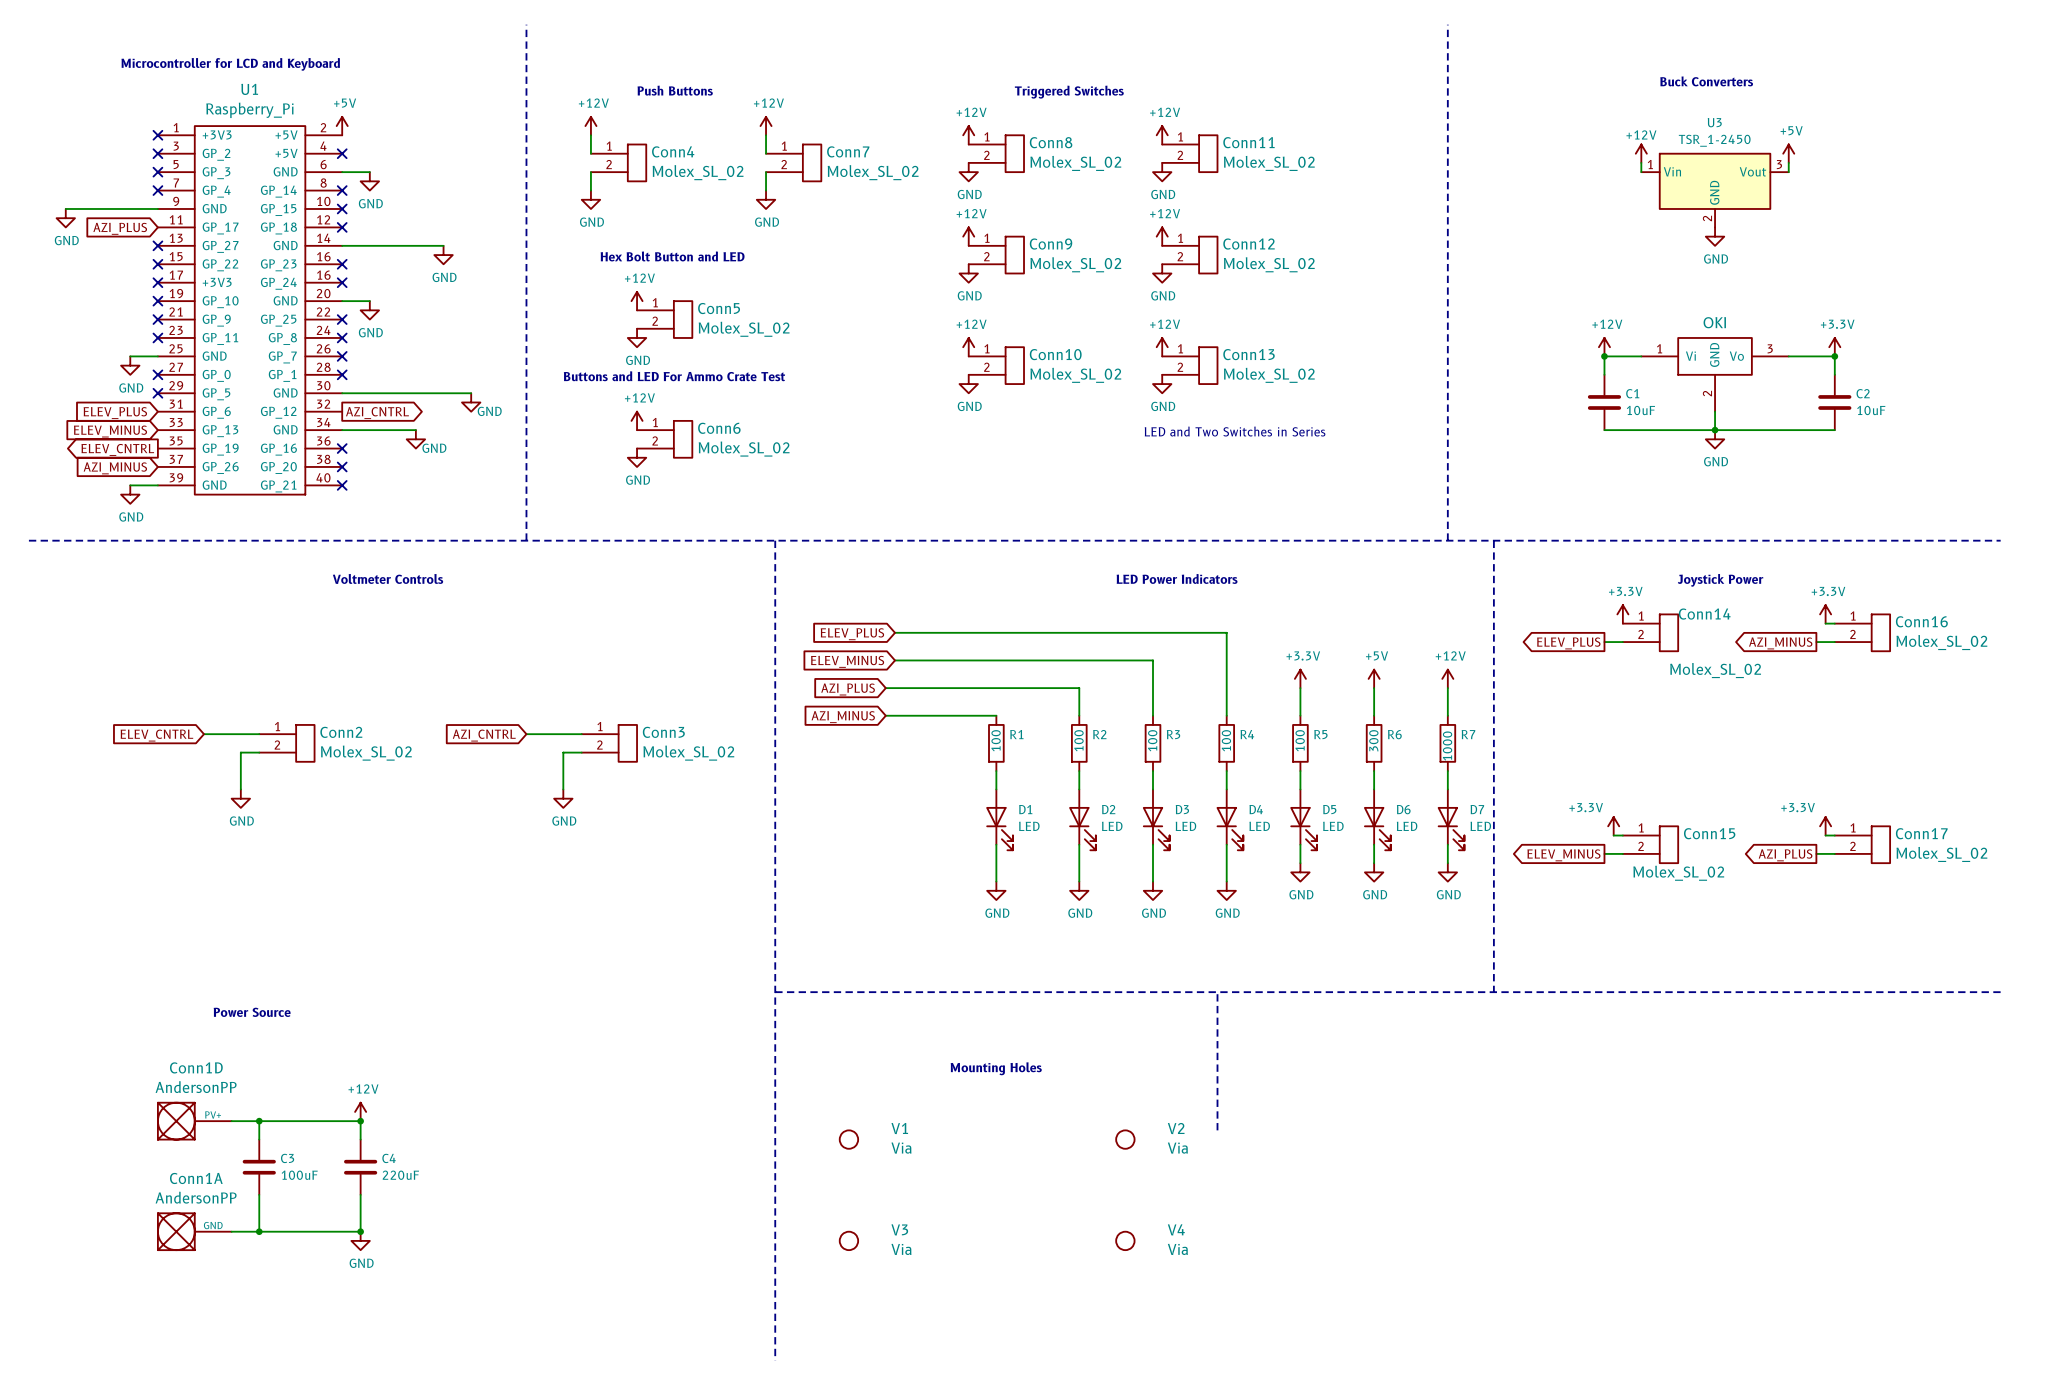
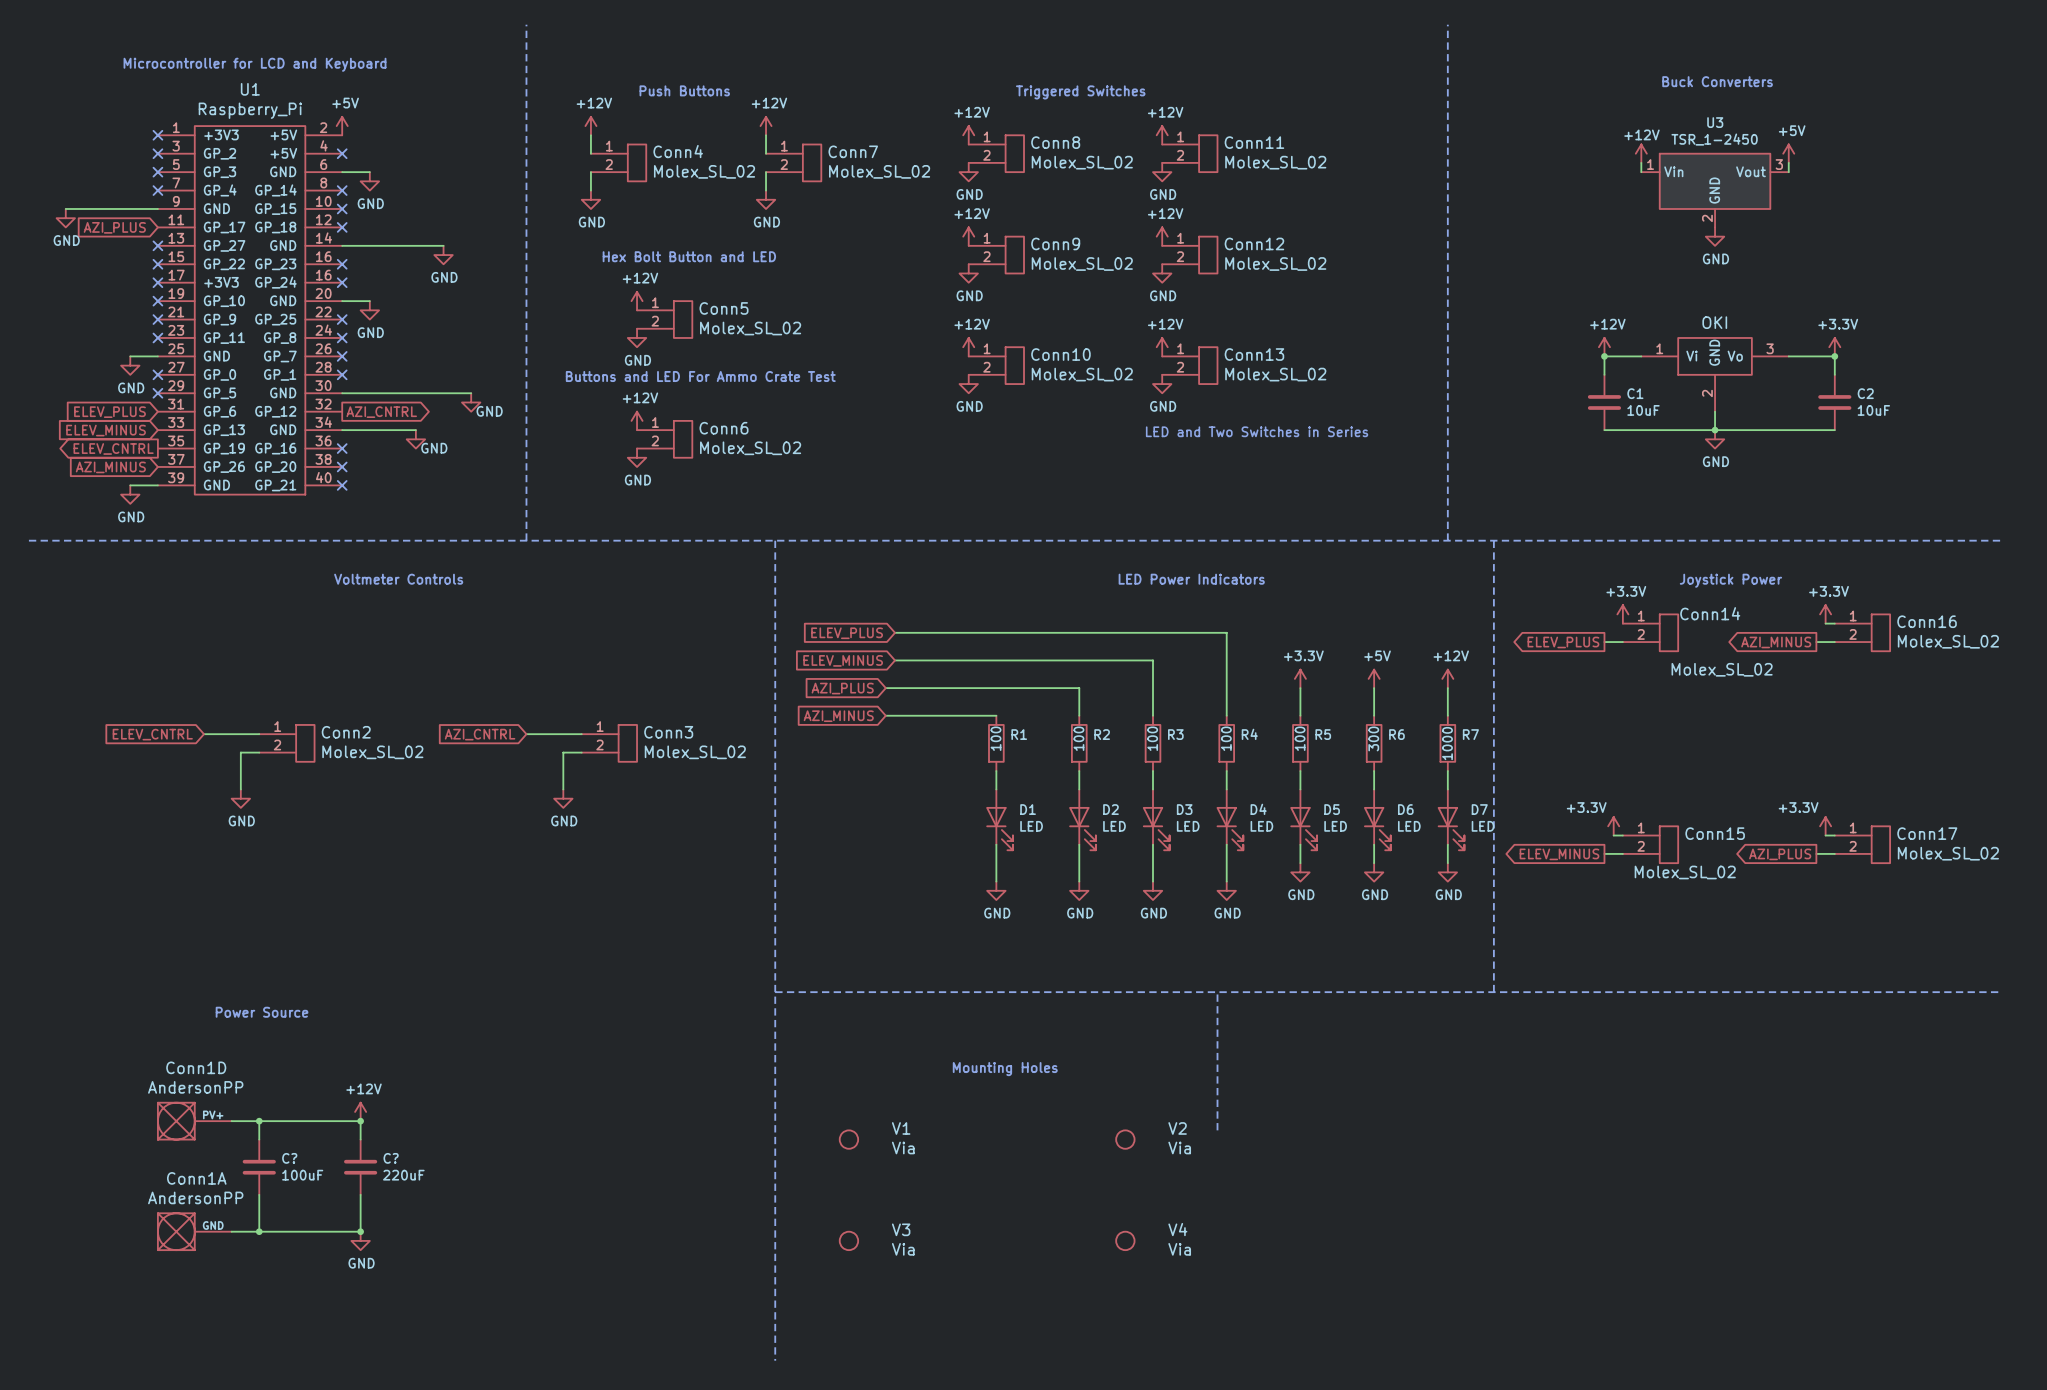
C3 name: C3 (287, 1158) -> C? (289, 1158)
C4 name: C4 (389, 1158) -> C? (391, 1158)

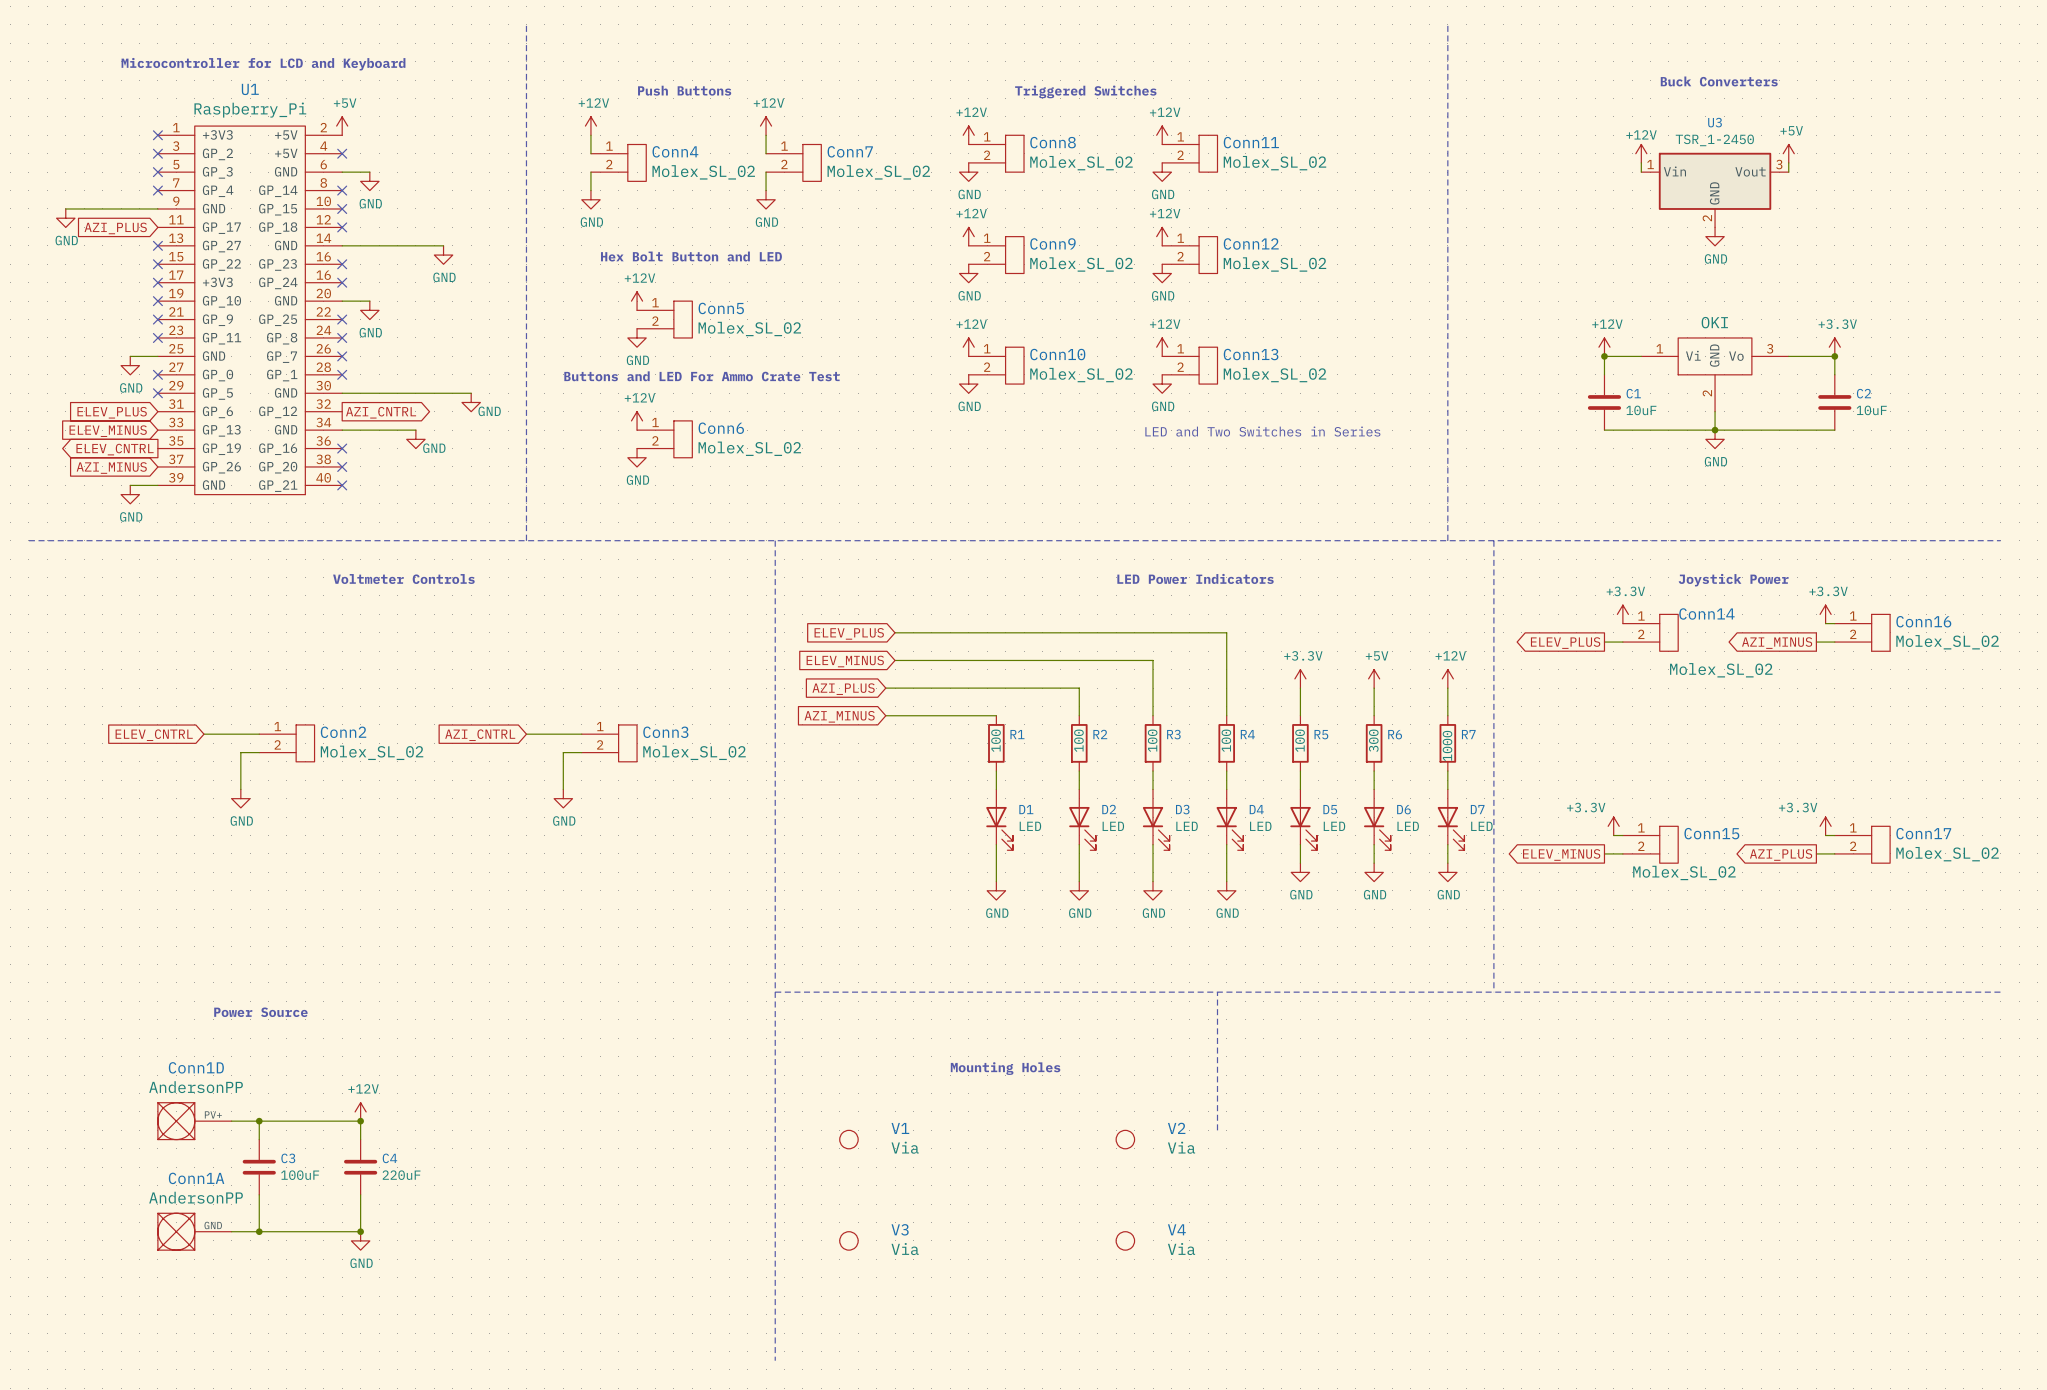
C? name: C? (289, 1158) -> C3 (288, 1158)
C? name: C? (391, 1158) -> C4 (389, 1158)

